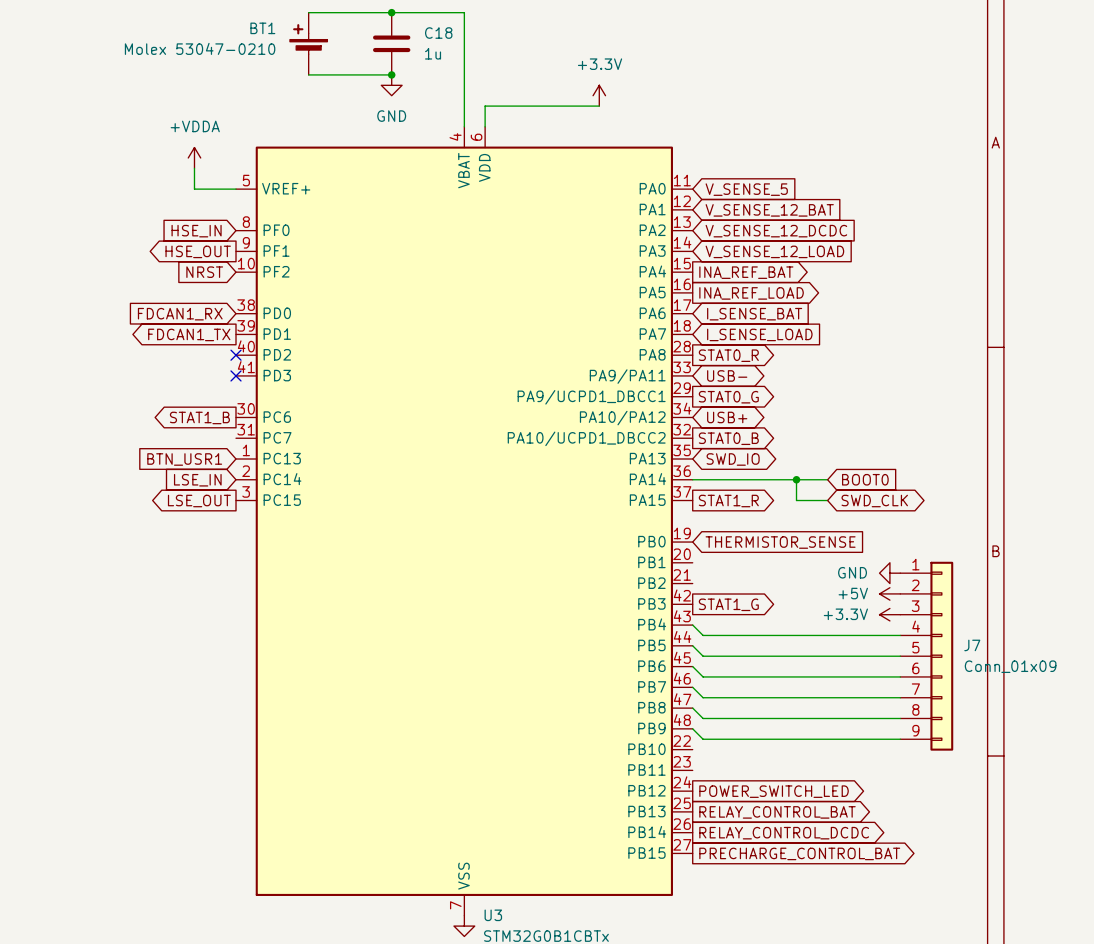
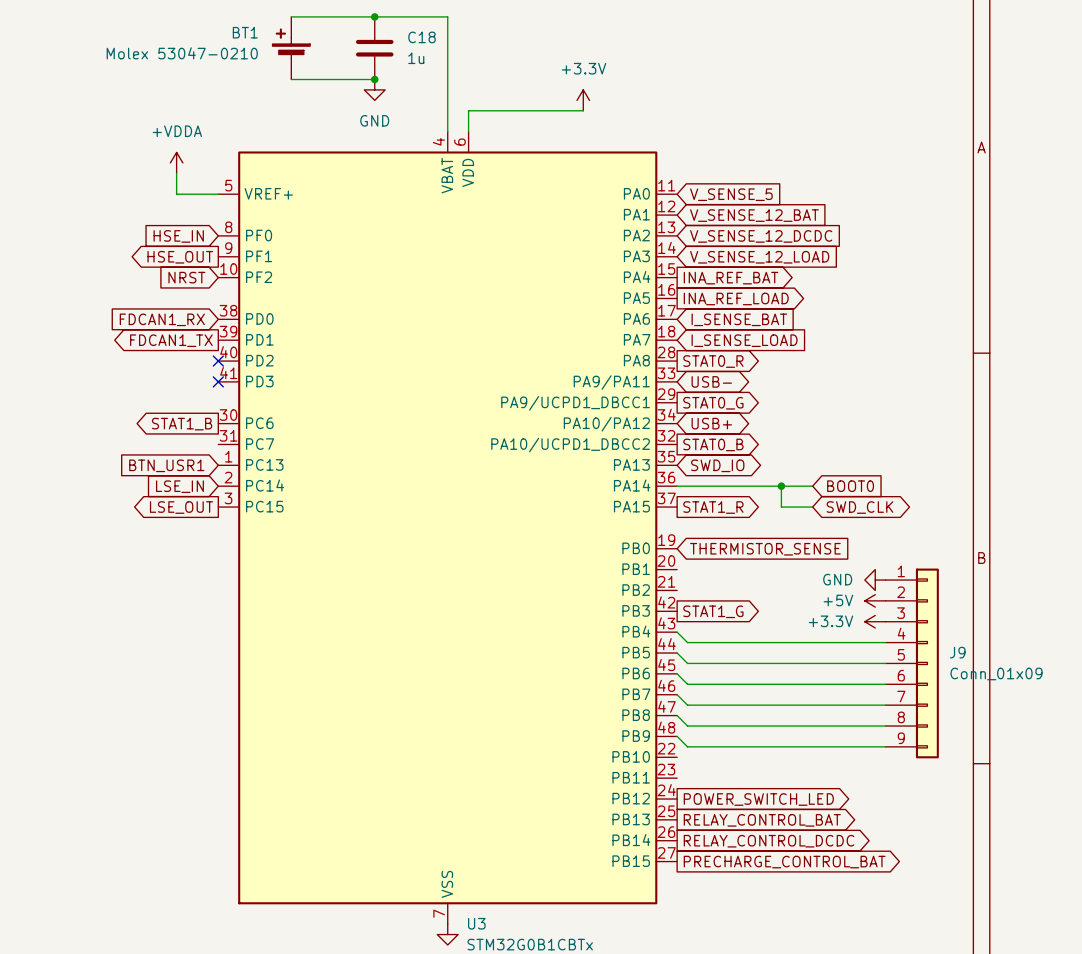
J7 name: J7 (972, 645) -> J9 (957, 652)

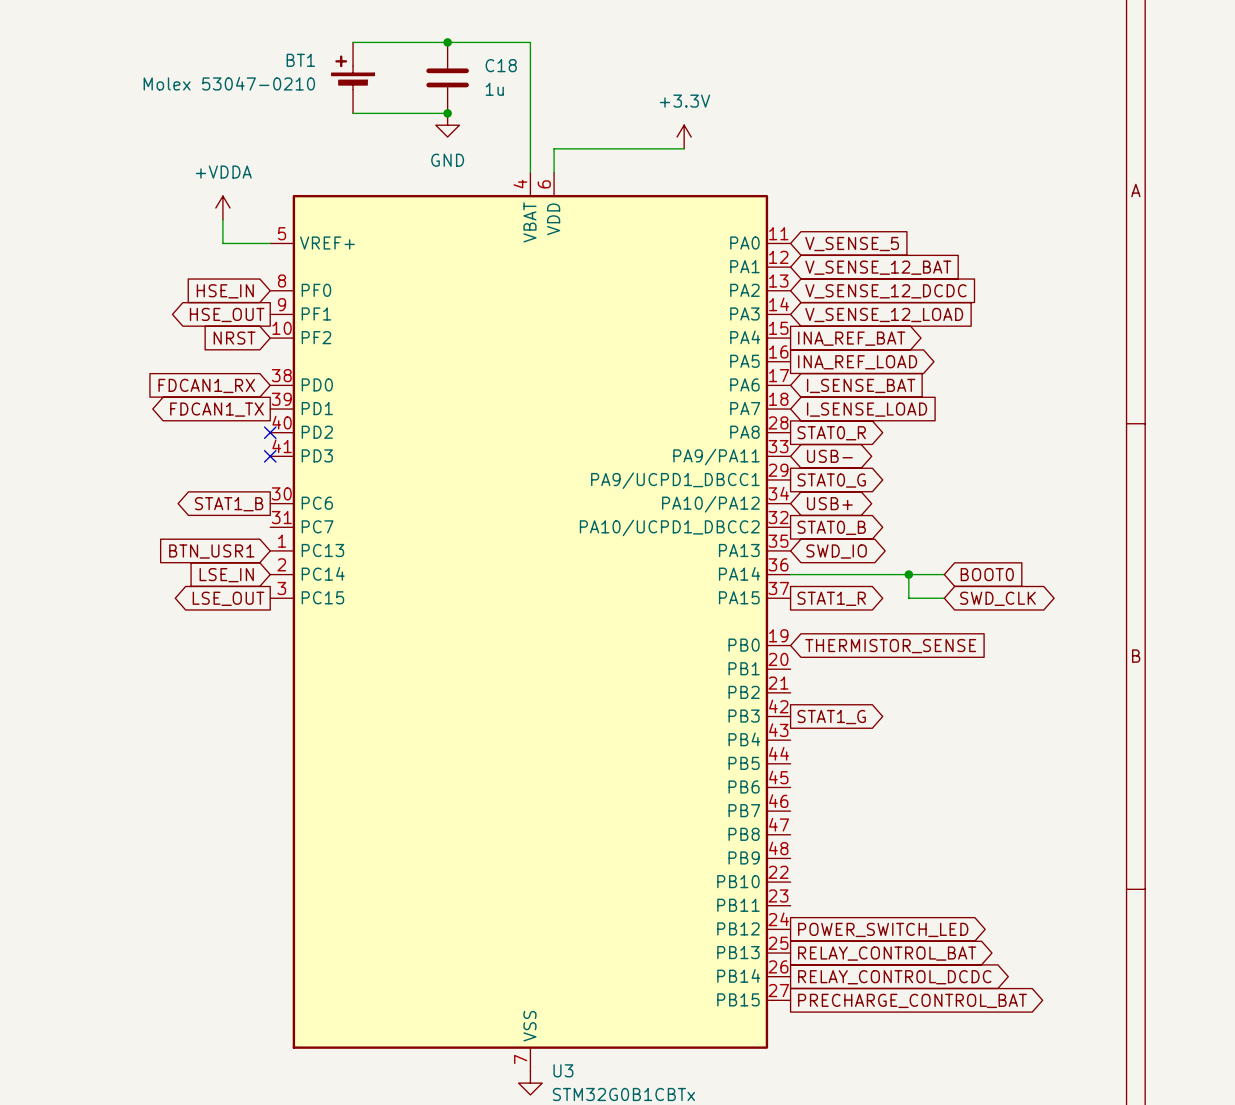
power symbol: GND (875, 580) -> none
power symbol: +5V (875, 600) -> none
power symbol: +3.3V (875, 621) -> none
wire: (677, 632) (687, 642) (885, 642) -> none
wire: (677, 653) (687, 663) (885, 663) -> none
J9: Conn_01x09 (912, 663) -> none
wire: (677, 673) (687, 684) (885, 684) -> none
wire: (677, 694) (687, 705) (885, 705) -> none
wire: (677, 715) (687, 726) (885, 726) -> none
wire: (677, 736) (687, 746) (885, 746) -> none

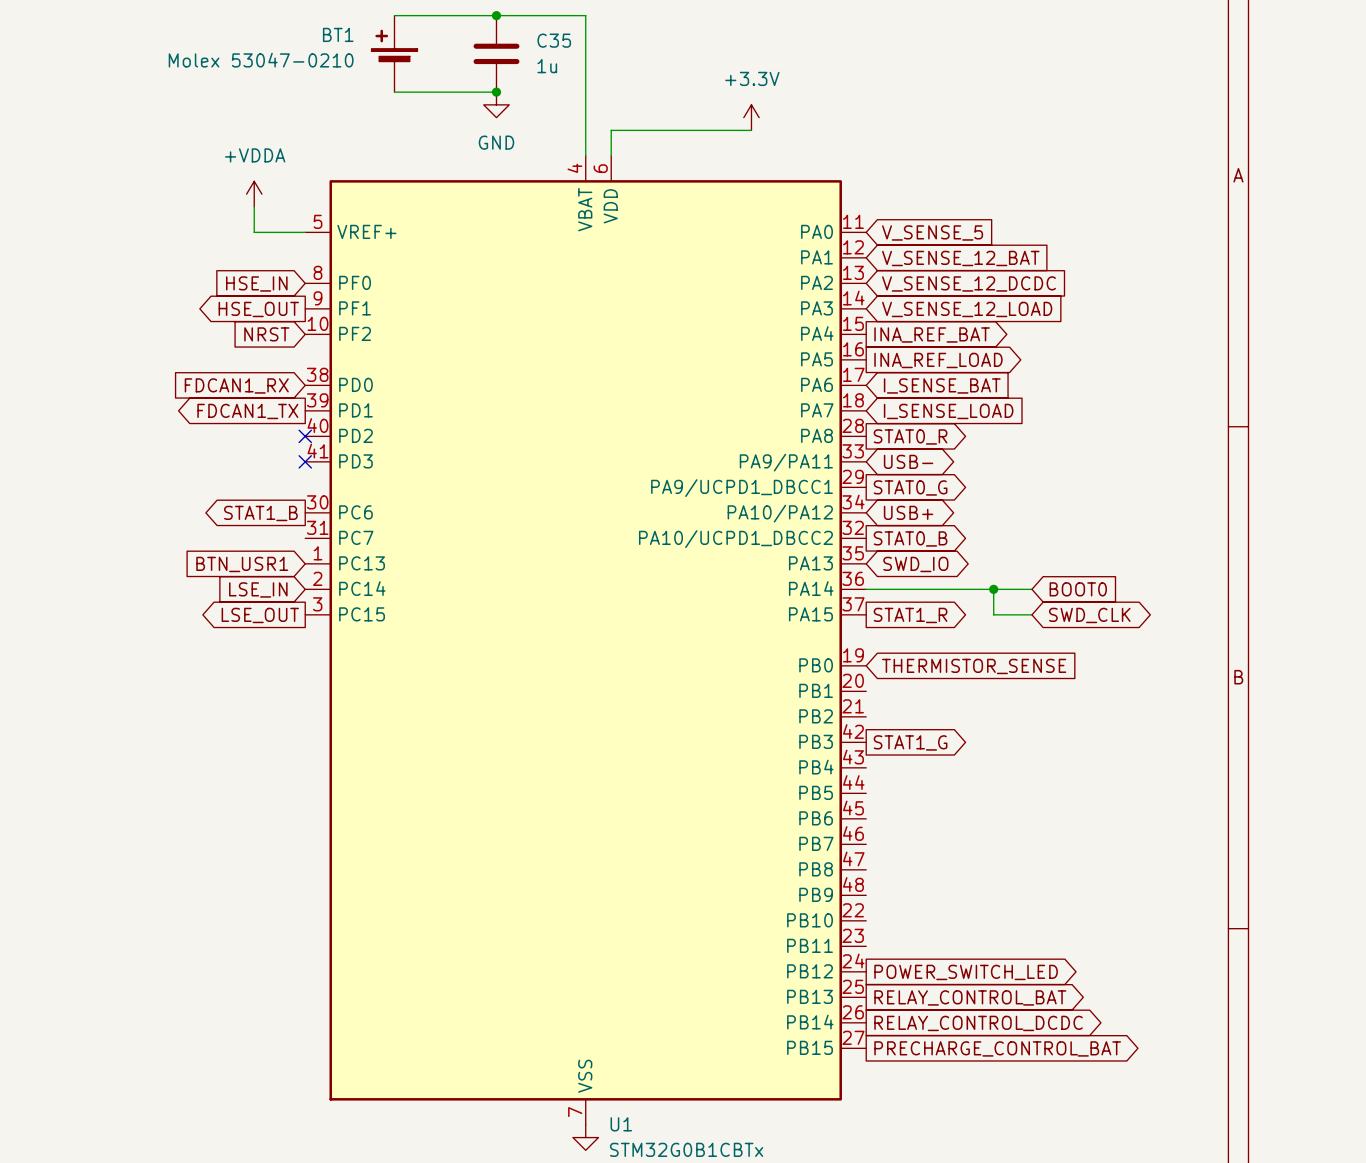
C18 name: C18 (501, 65) -> C35 (554, 40)
U3 name: U3 (563, 1070) -> U1 (621, 1124)

